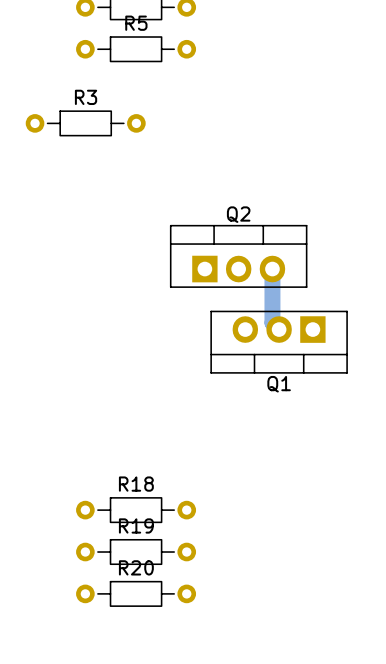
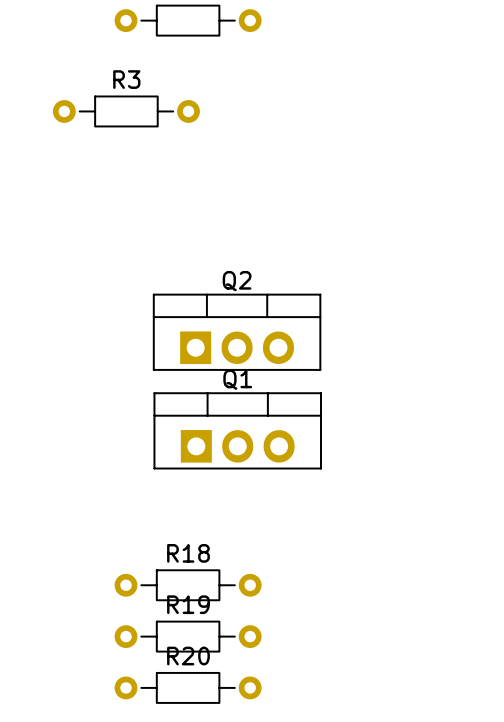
Q2 position: (238, 256) -> (237, 332)
bottom track: (272, 269) (272, 322) (279, 329) -> none
Q1 rotation: 0° (279, 342) -> 180° (237, 430)
Q1 position: (279, 342) -> (237, 430)

